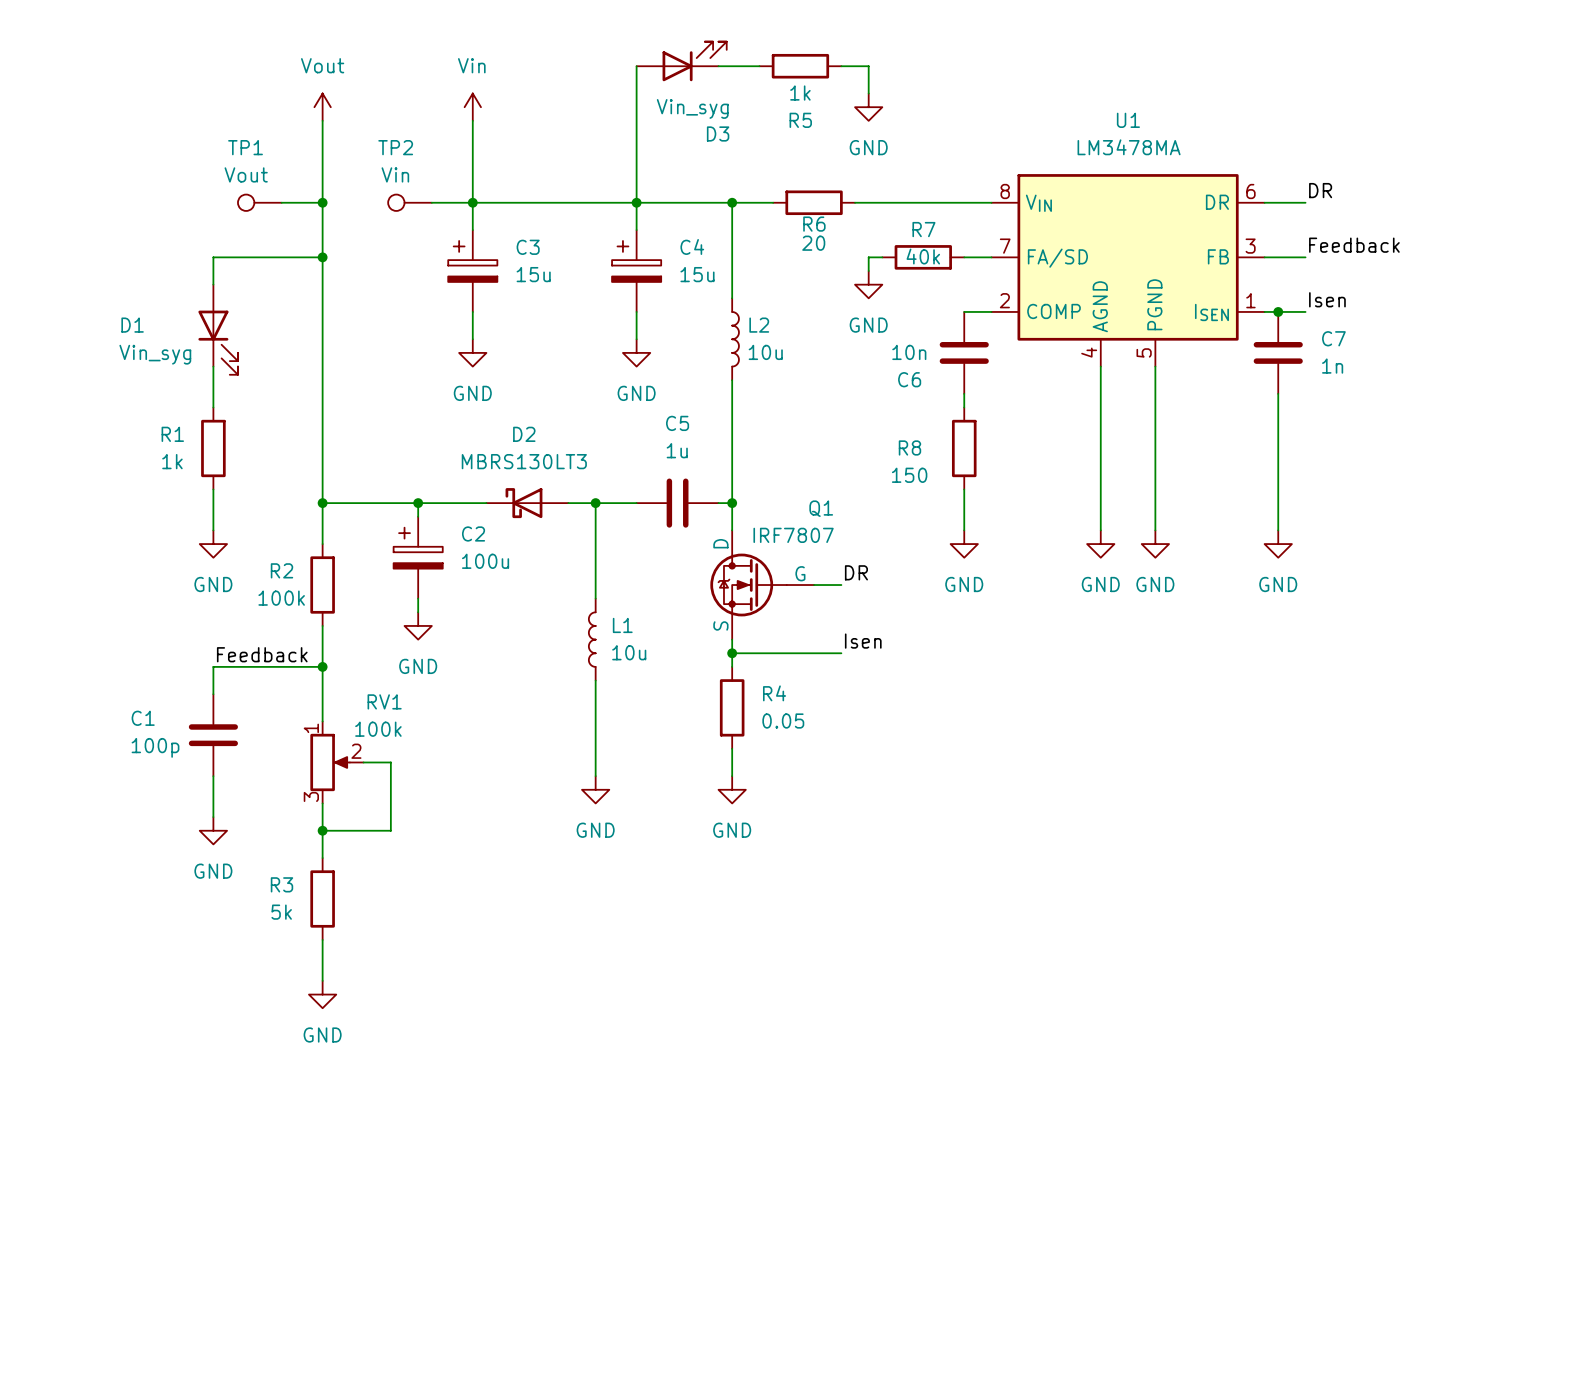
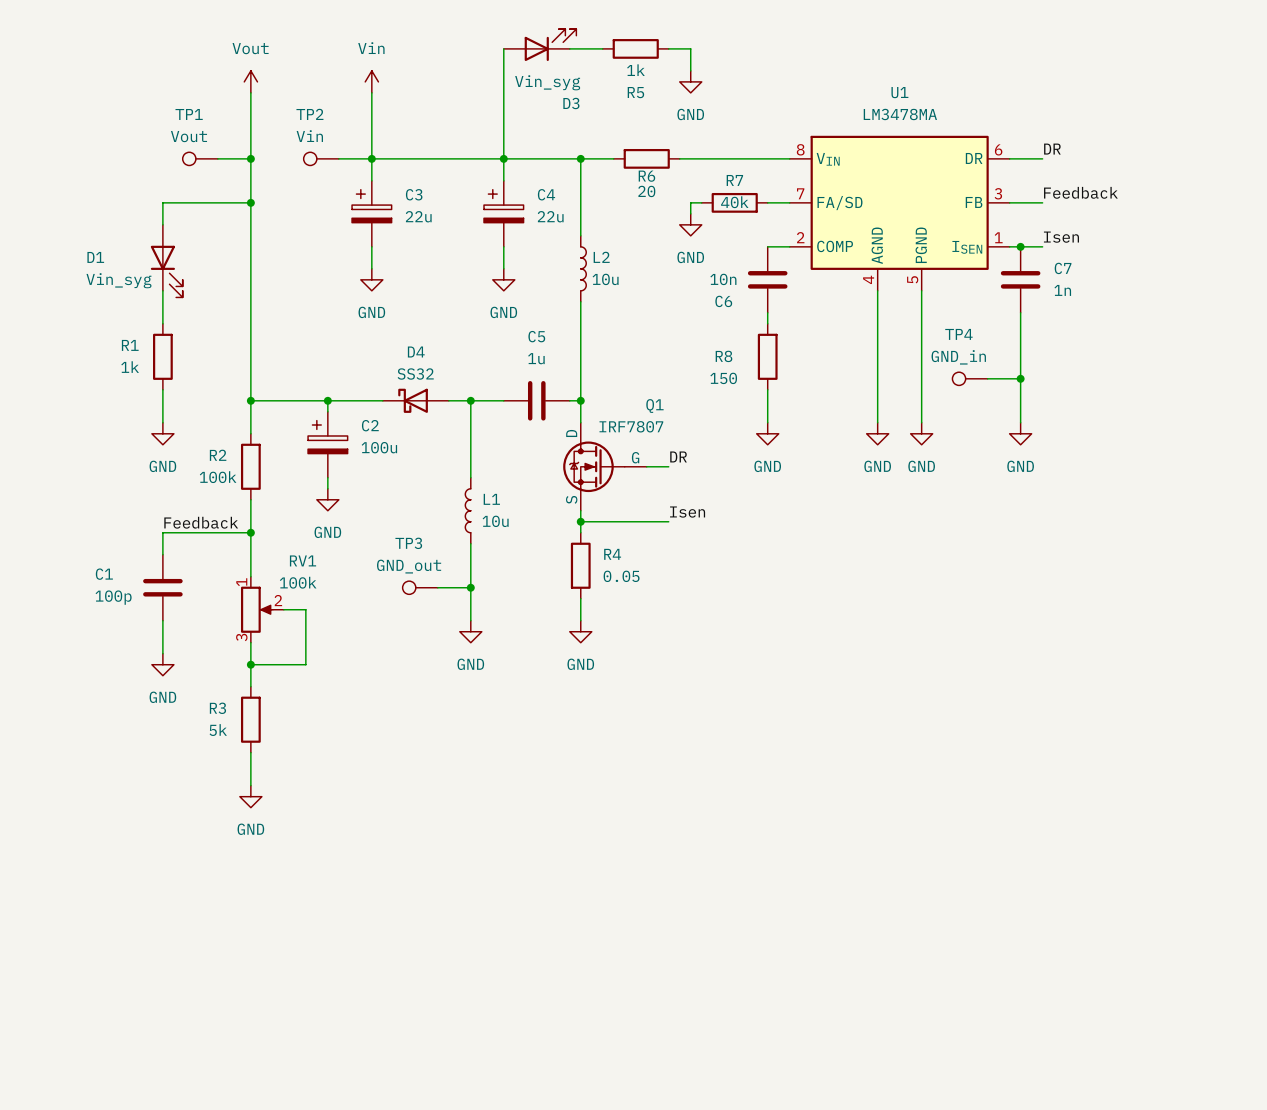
C3 value: 15u (533, 274) -> 22u (418, 216)
C4 value: 15u (697, 274) -> 22u (550, 216)
D2 name: D2 (524, 434) -> D4 (416, 352)
D2 value: MBRS130LT3 (524, 461) -> SS32 (415, 374)
TP4: none -> GND_in (970, 378)
wire: none -> (987, 378) (1020, 378)
junction: none -> (1020, 378)
TP3: none -> GND_out (420, 587)
wire: none -> (437, 587) (470, 587)
junction: none -> (470, 587)

